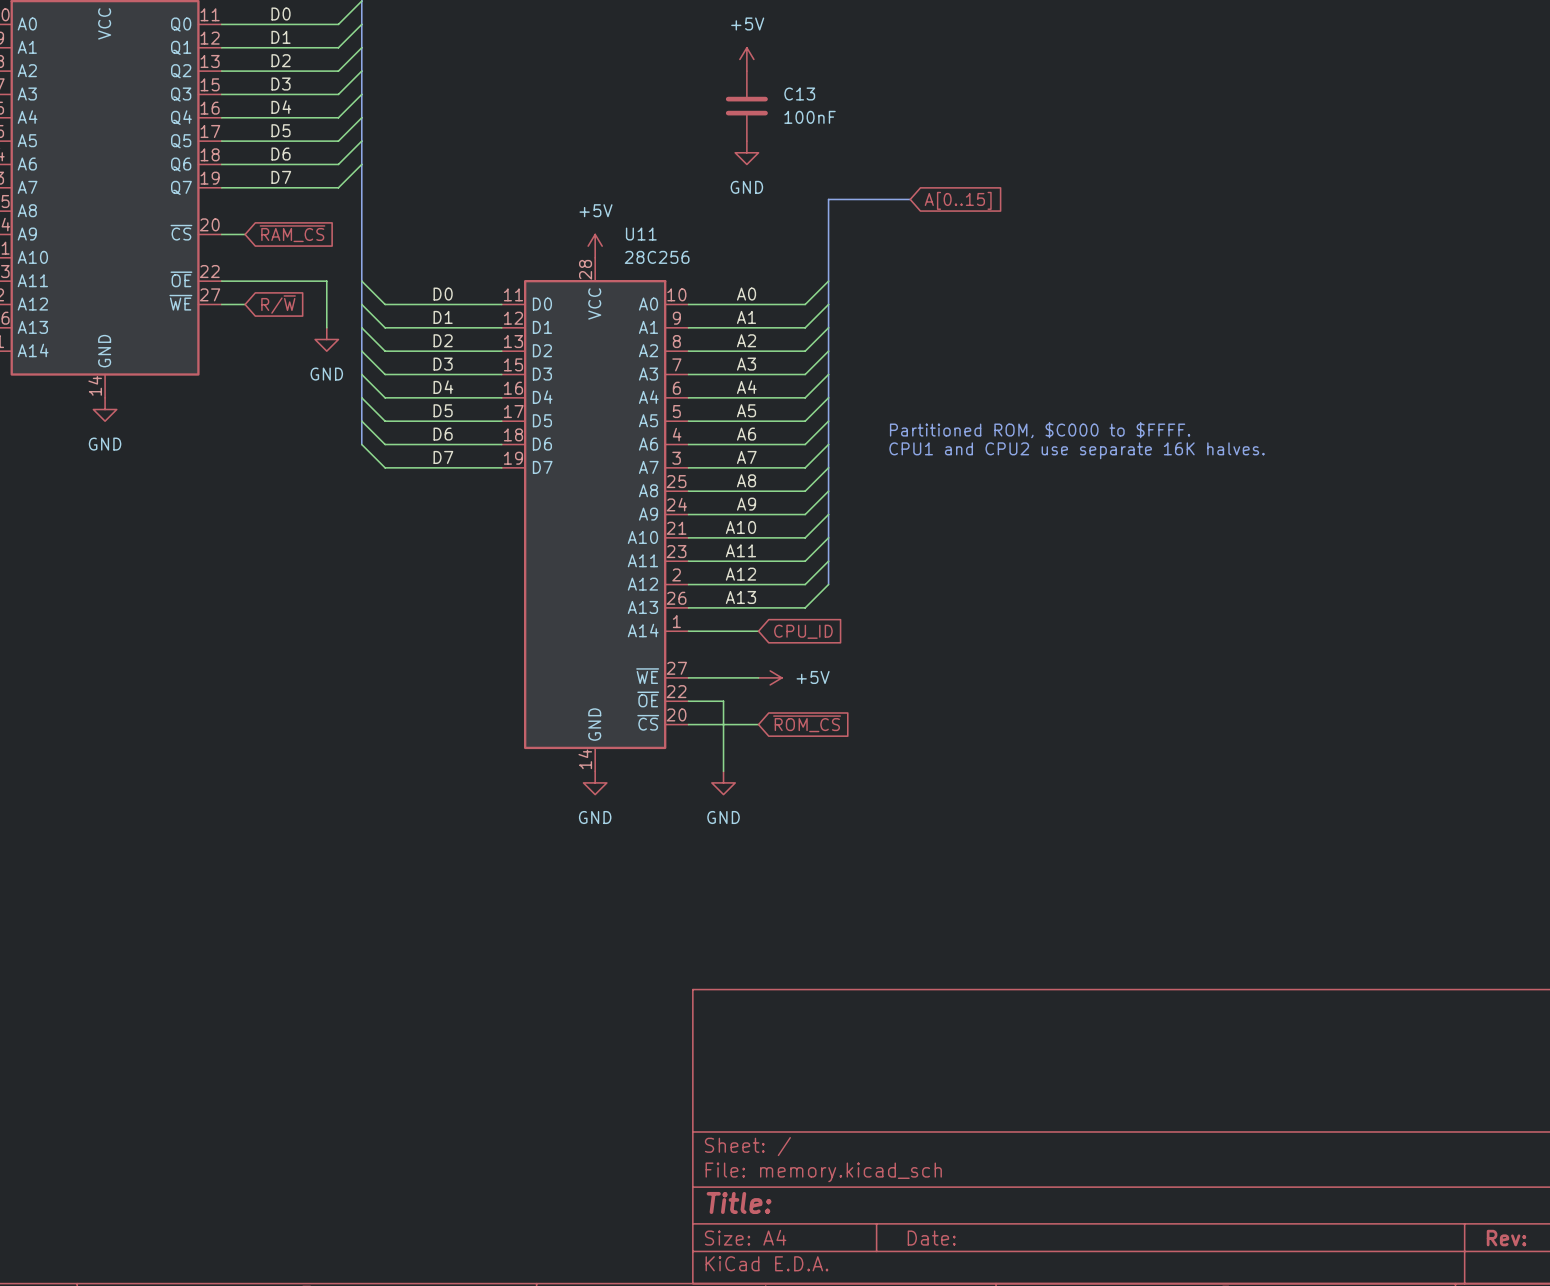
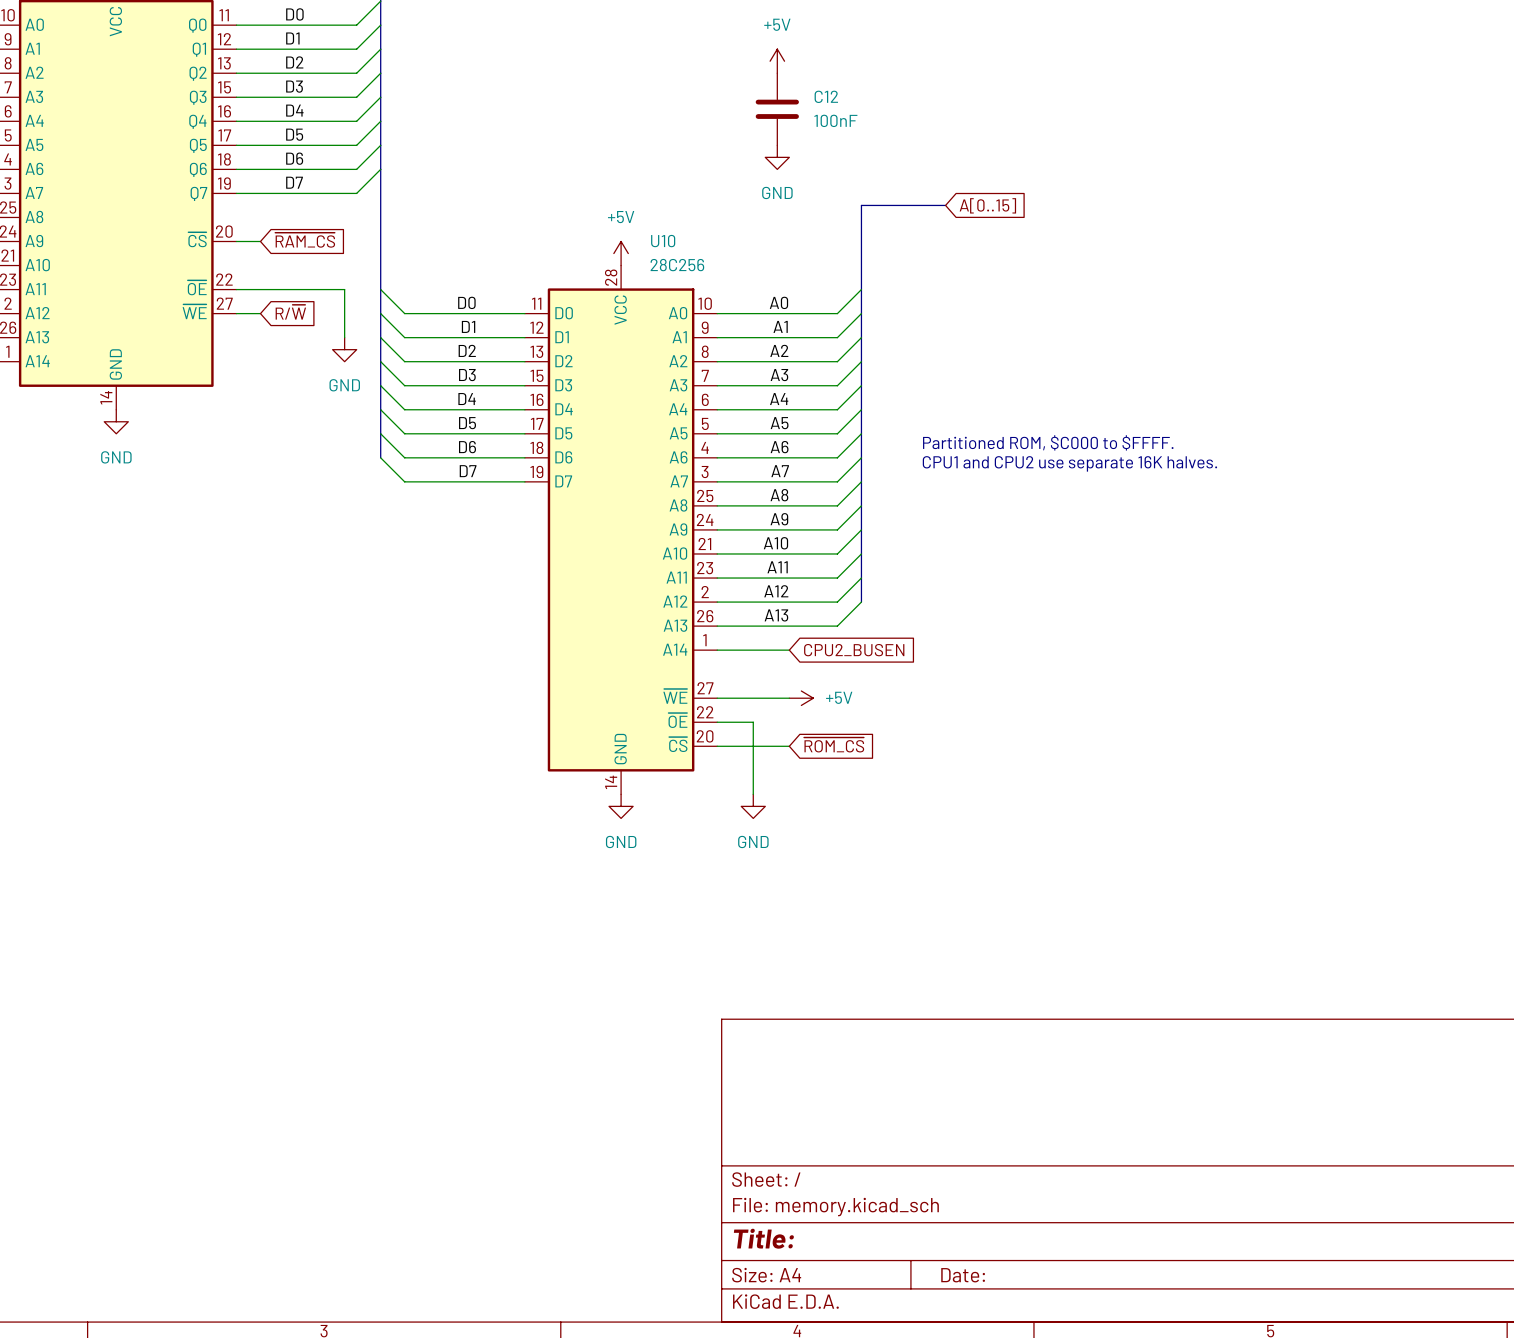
C13 name: C13 (799, 94) -> C12 (826, 96)
U11 name: U11 (641, 234) -> U10 (663, 241)
global label: CPU_ID (803, 631) -> CPU2_BUSEN (854, 650)

